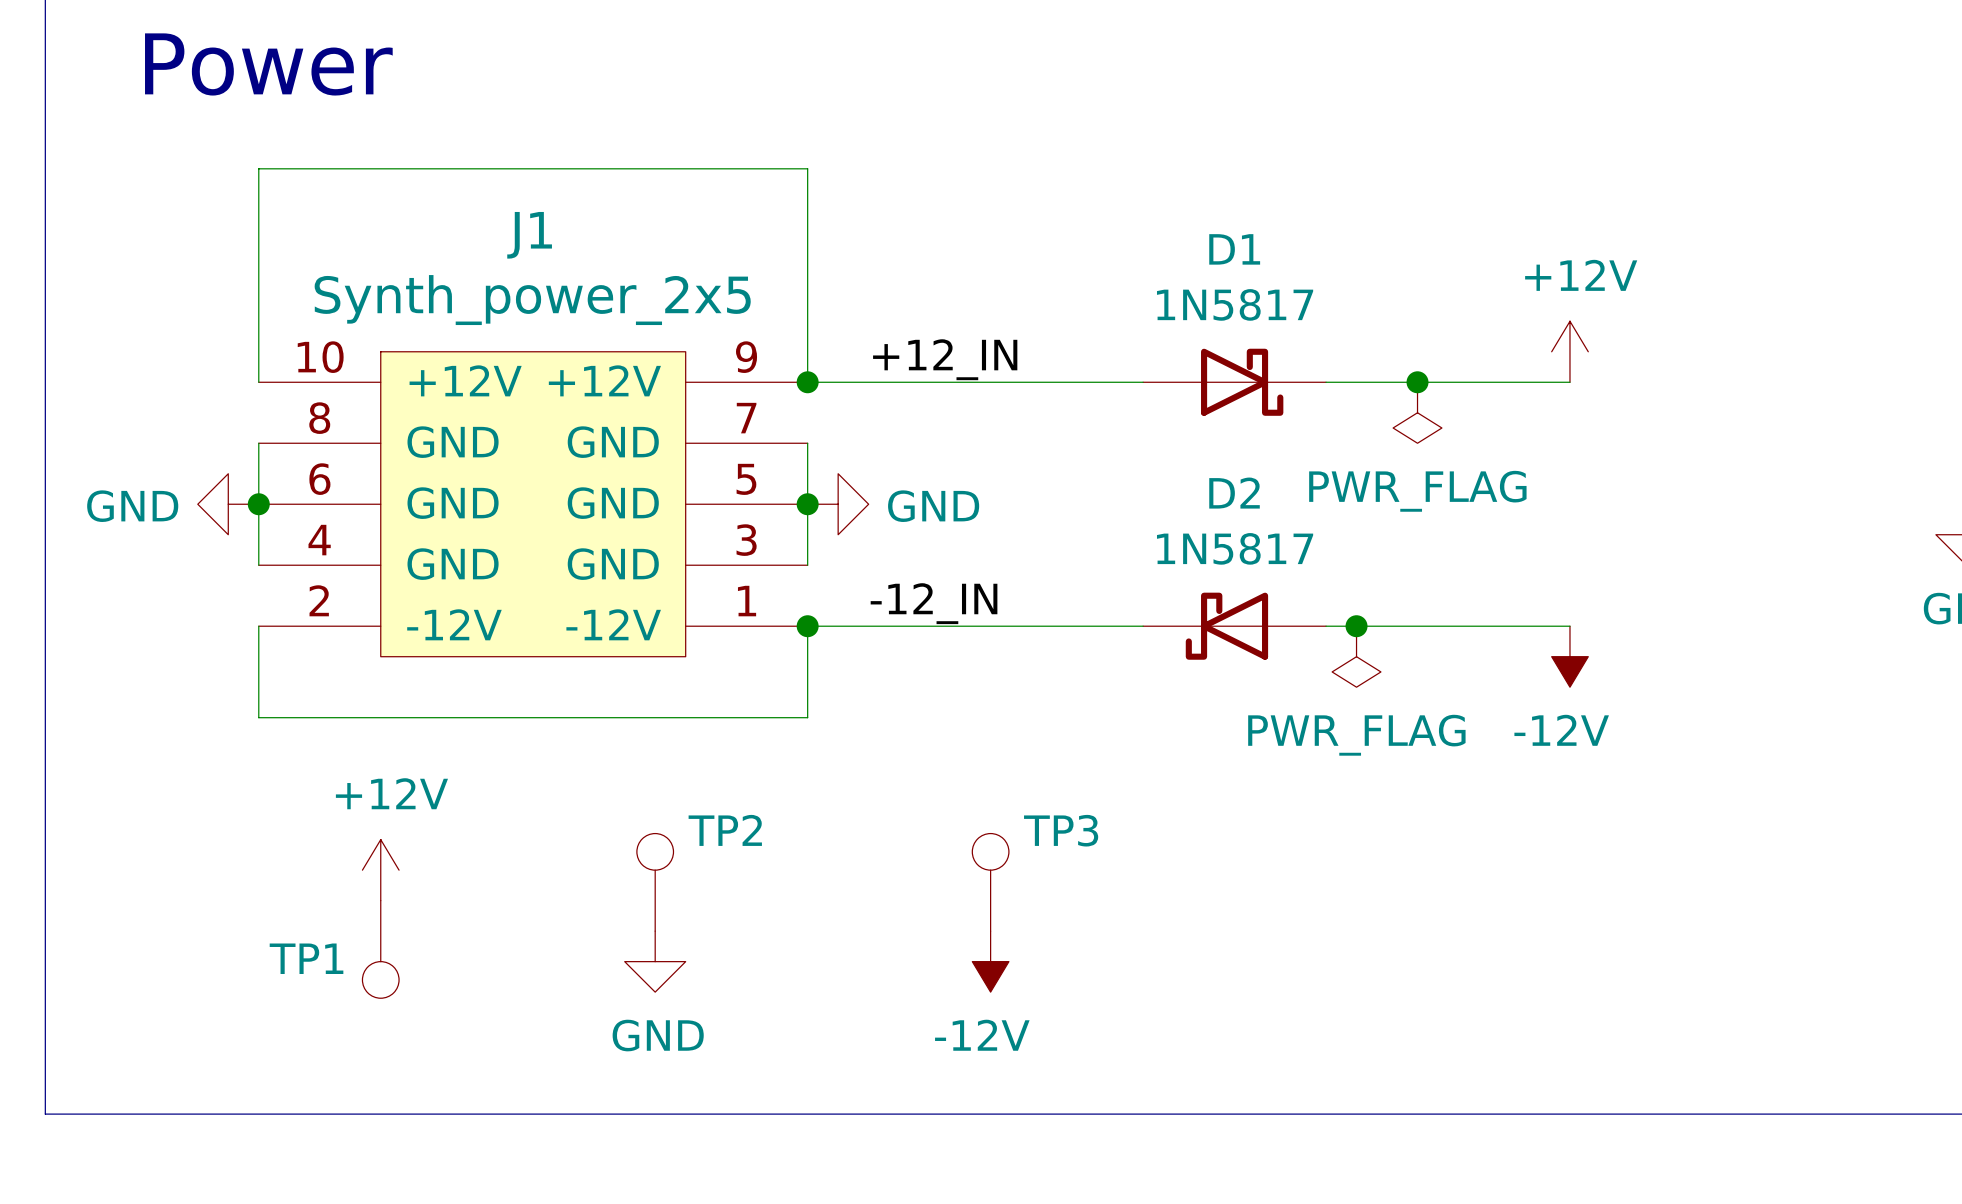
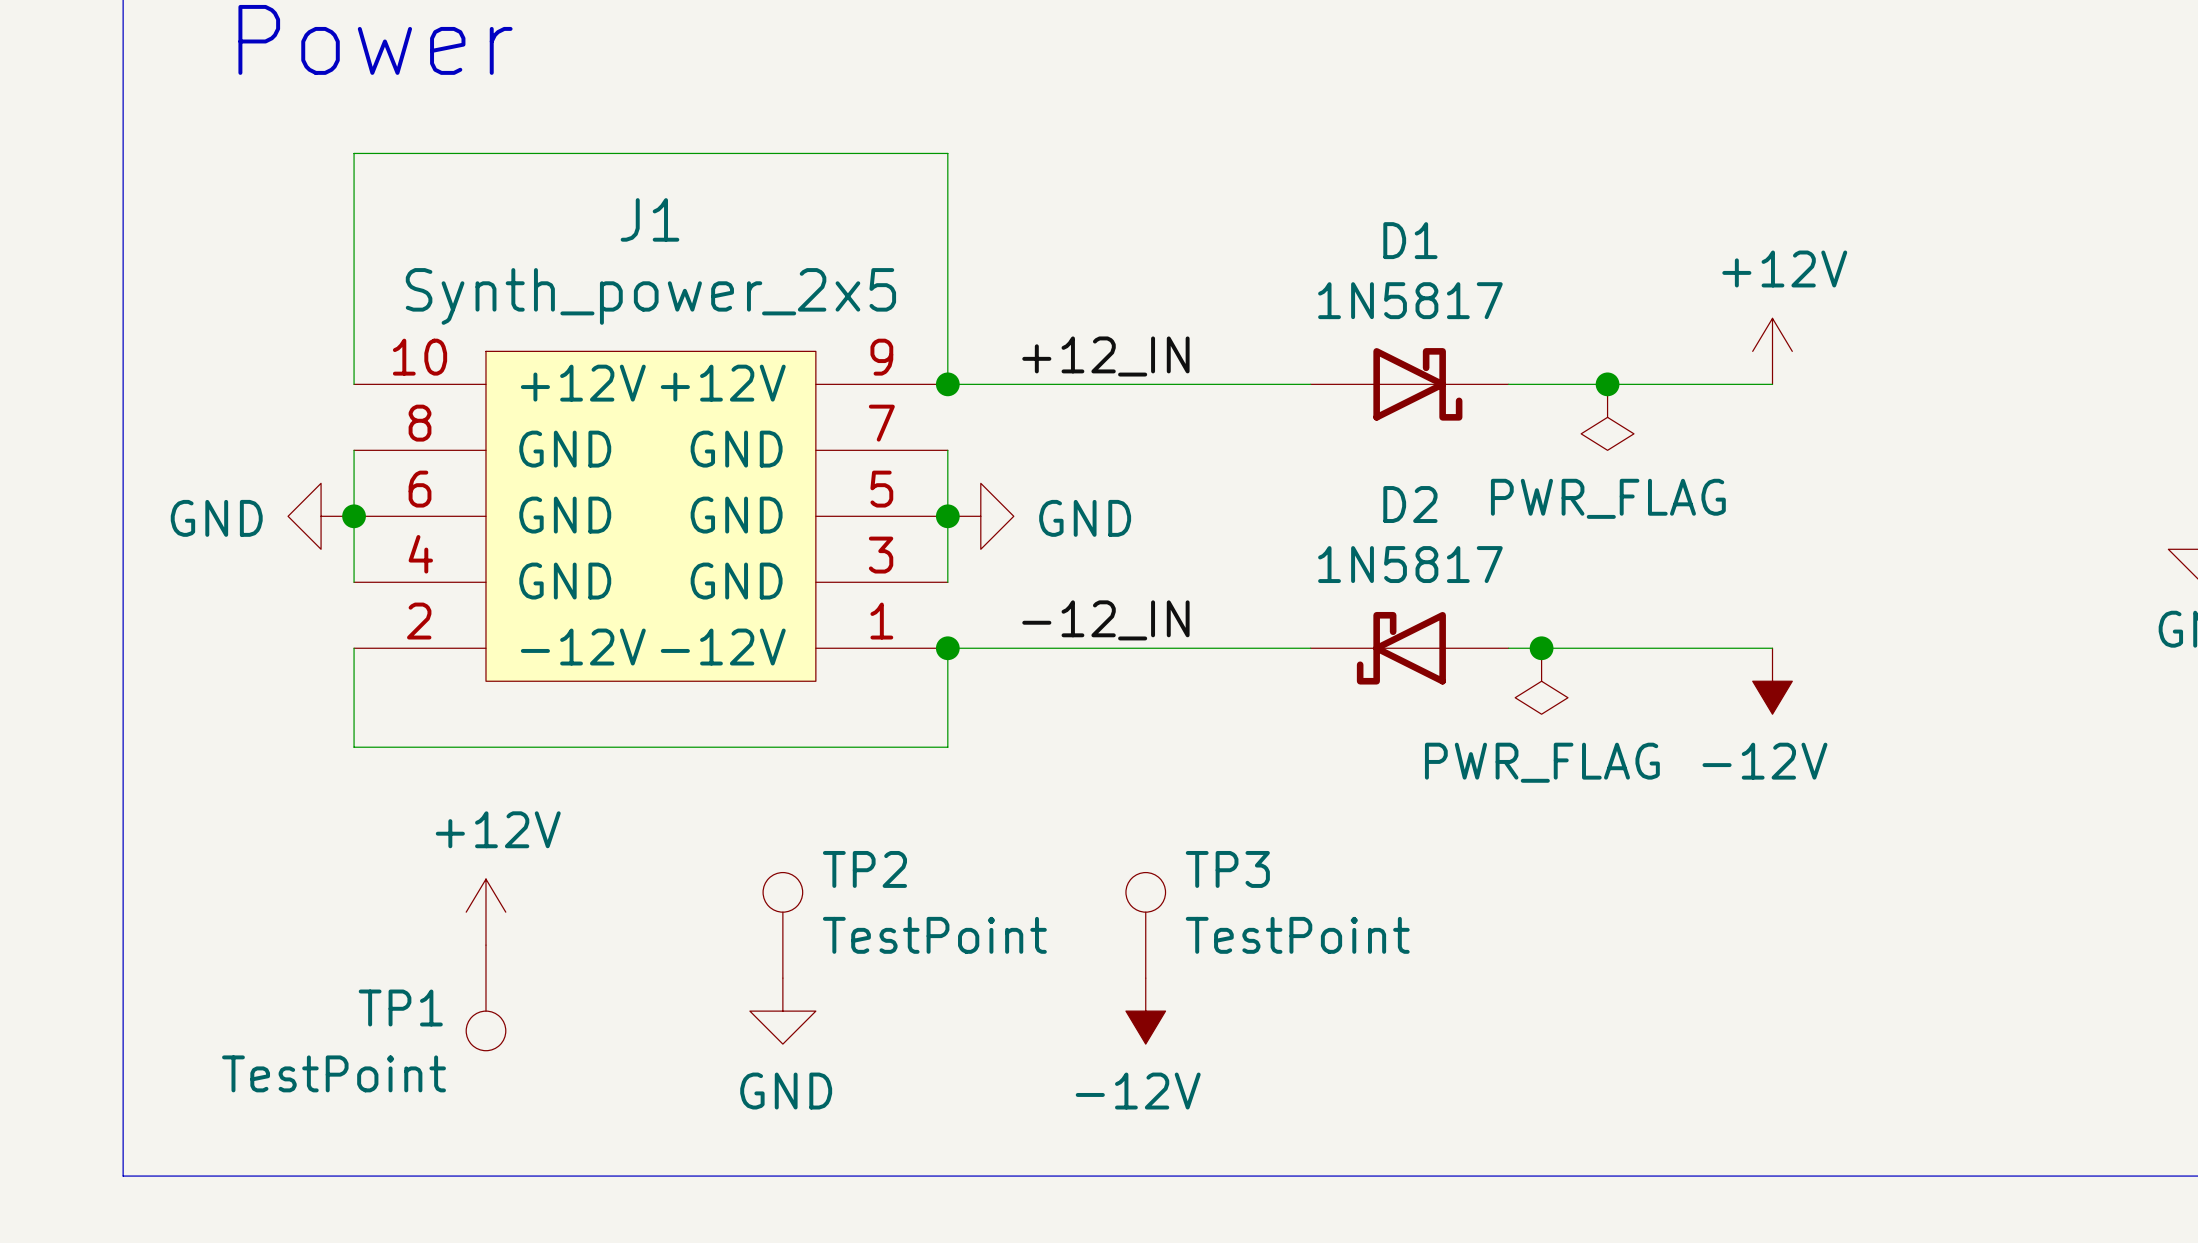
TP2 value: none -> TestPoint (934, 935)
TP3 value: none -> TestPoint (1297, 935)
TP1 value: none -> TestPoint (334, 1073)

